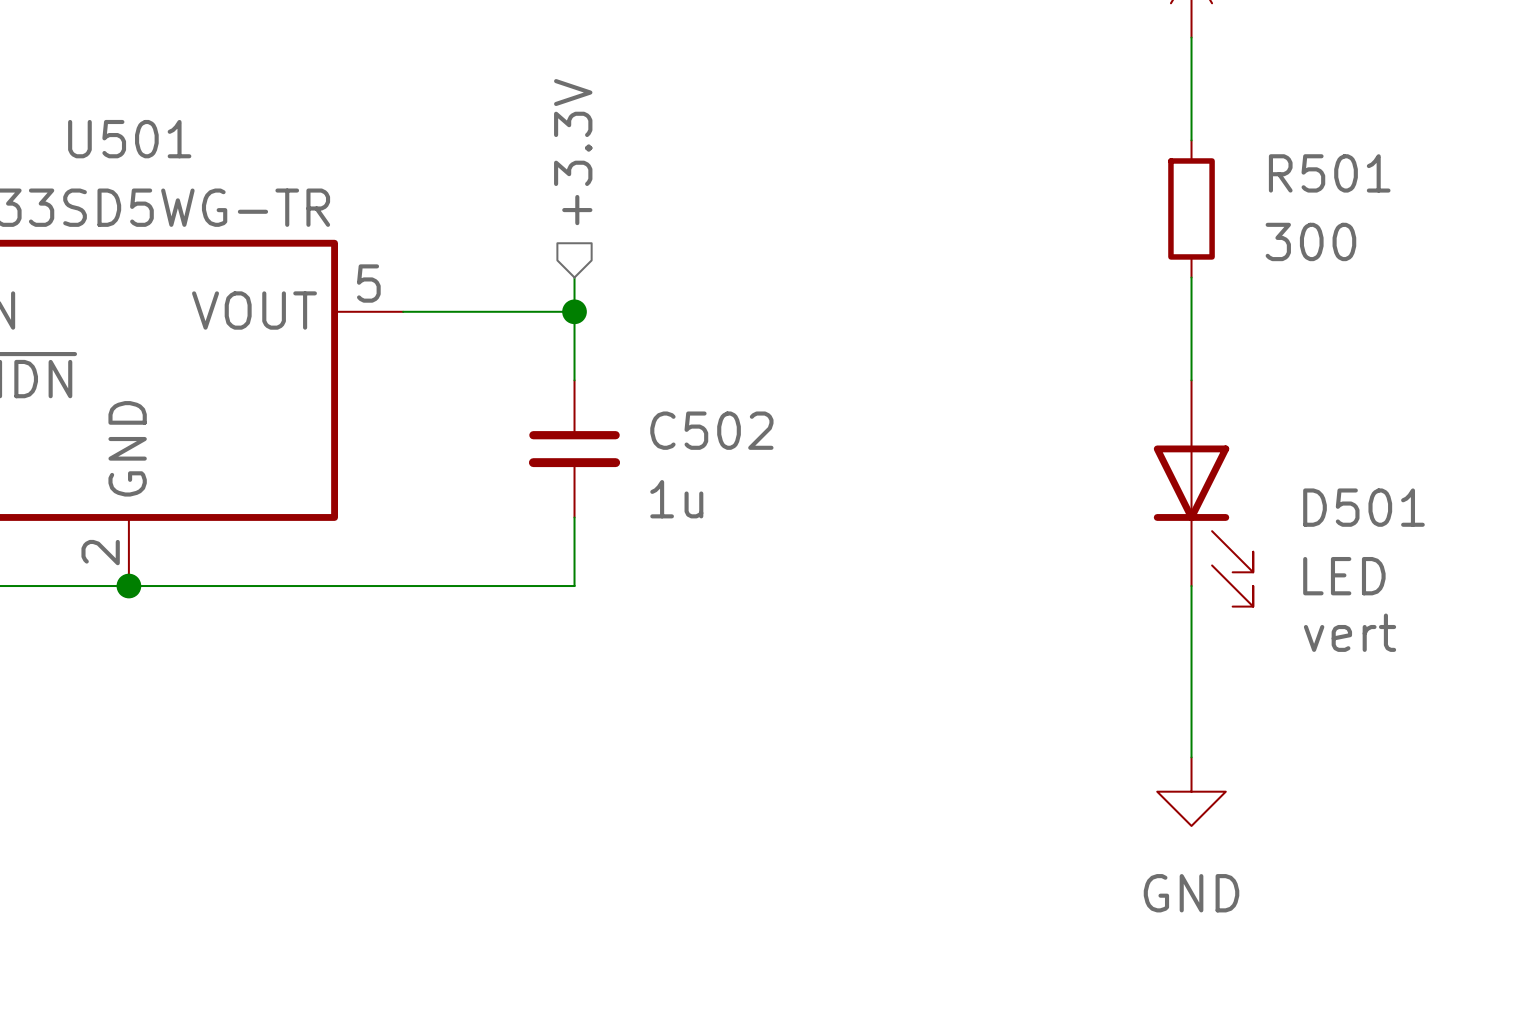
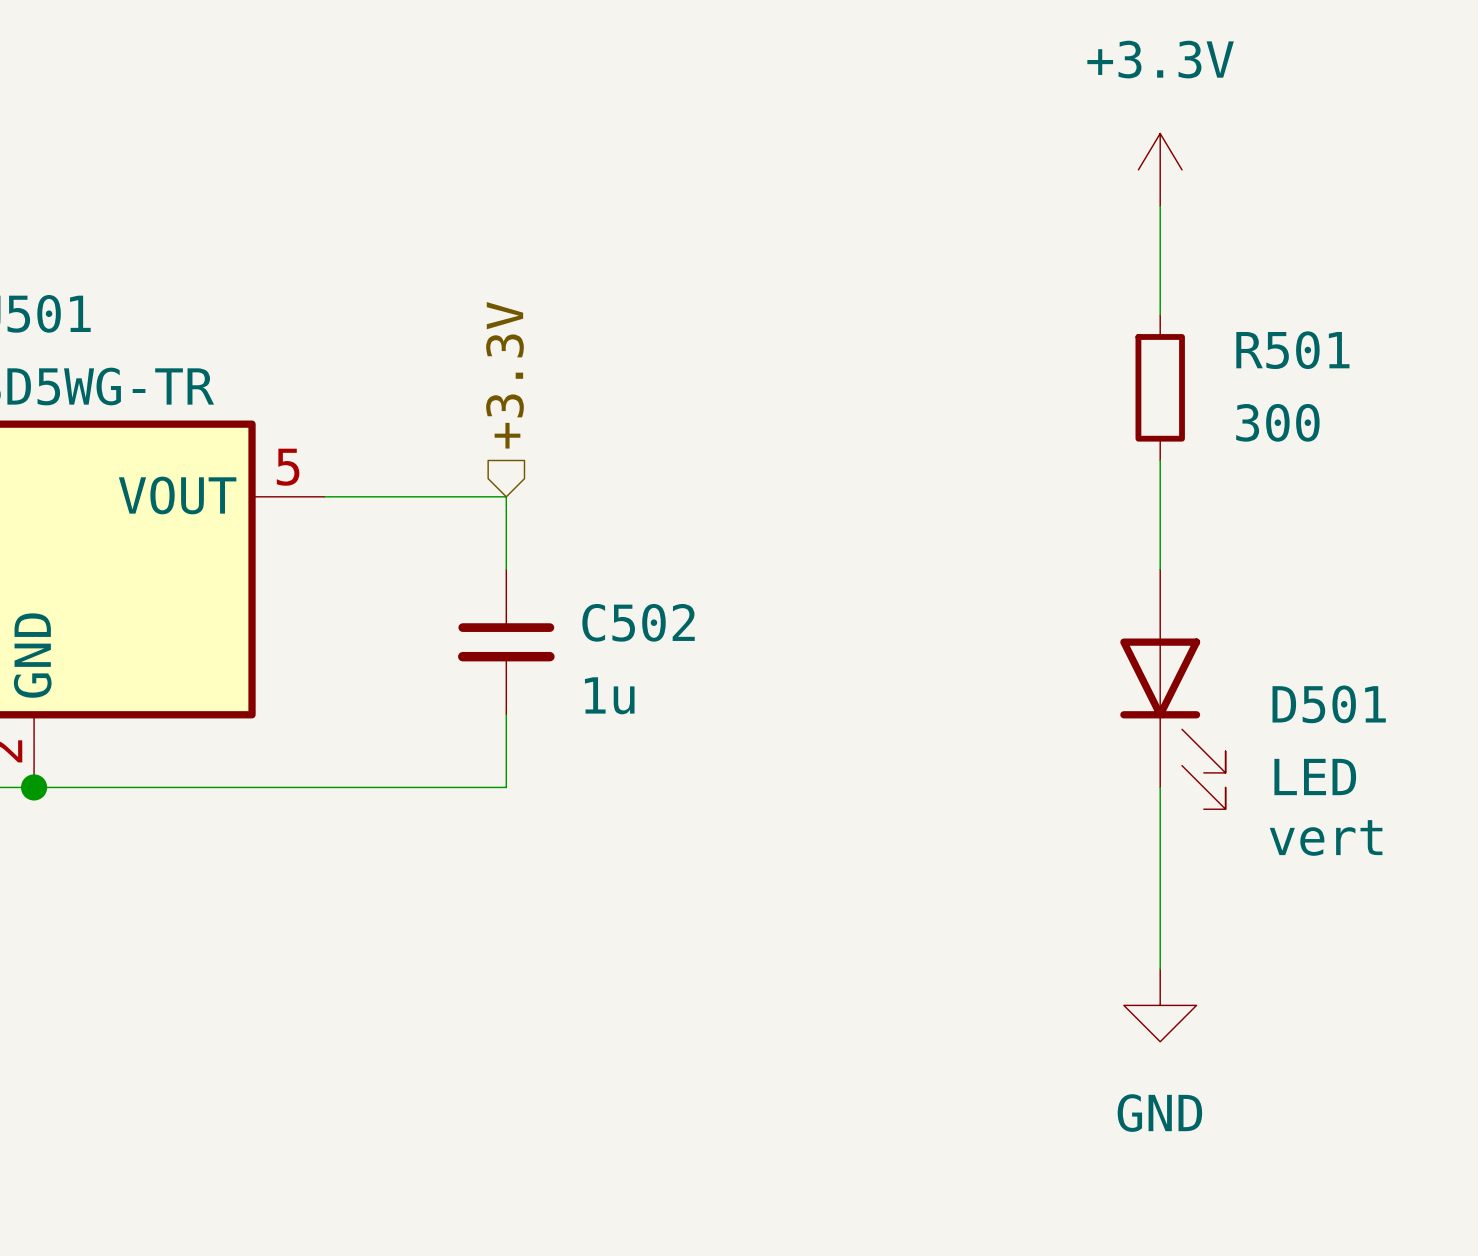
hierarchical label position: +3.3V (573, 152) -> +3.3V (504, 375)
wire: (574, 277) (574, 311) -> none
junction: (574, 311) -> none

